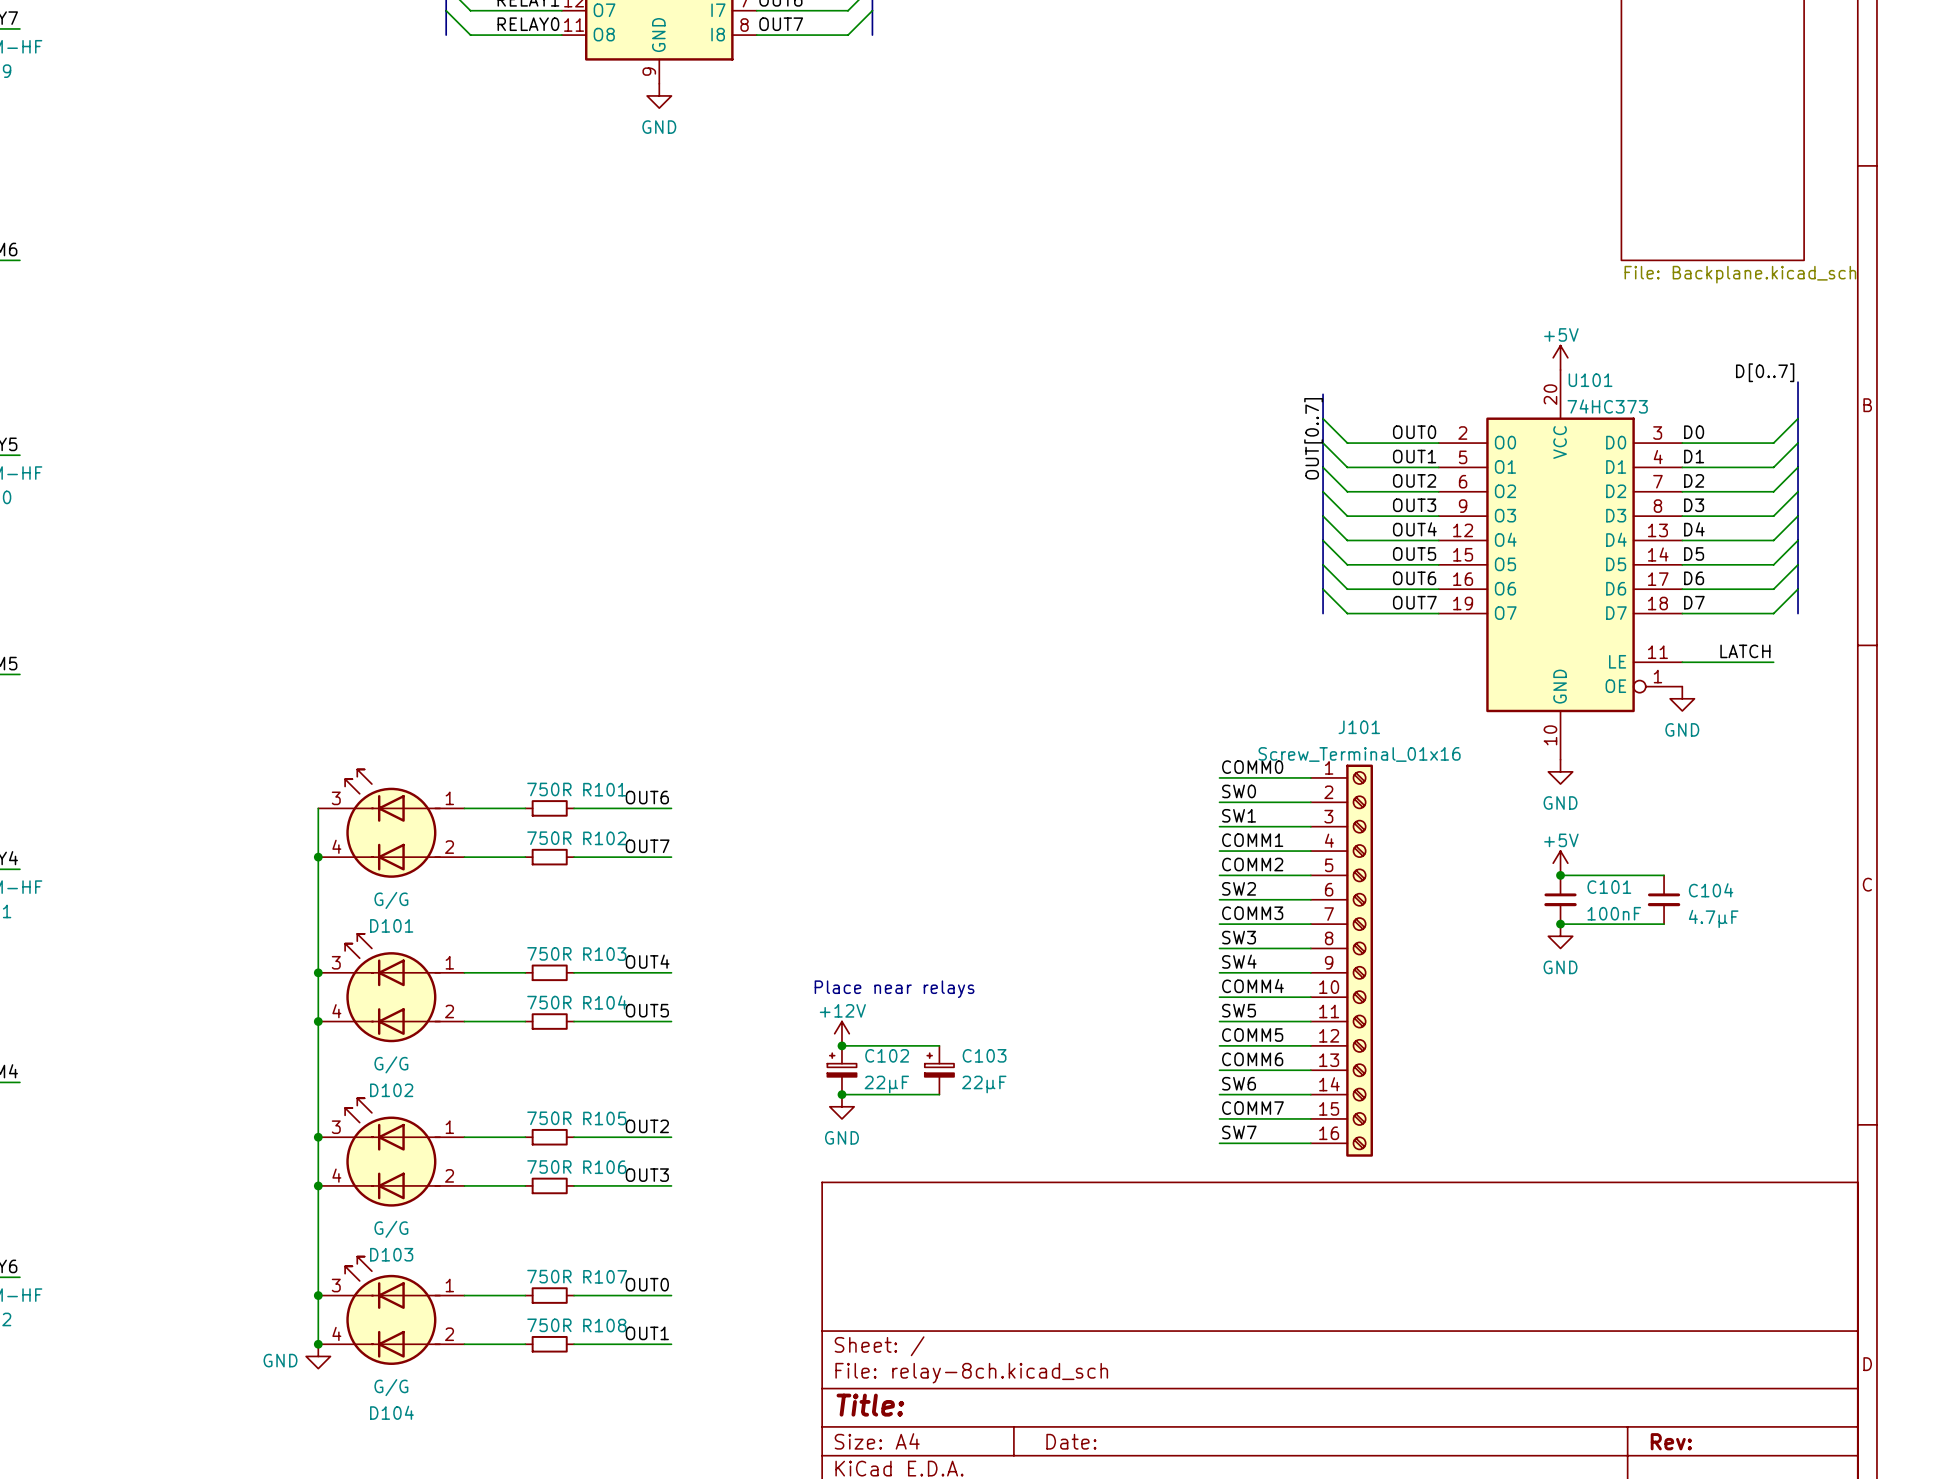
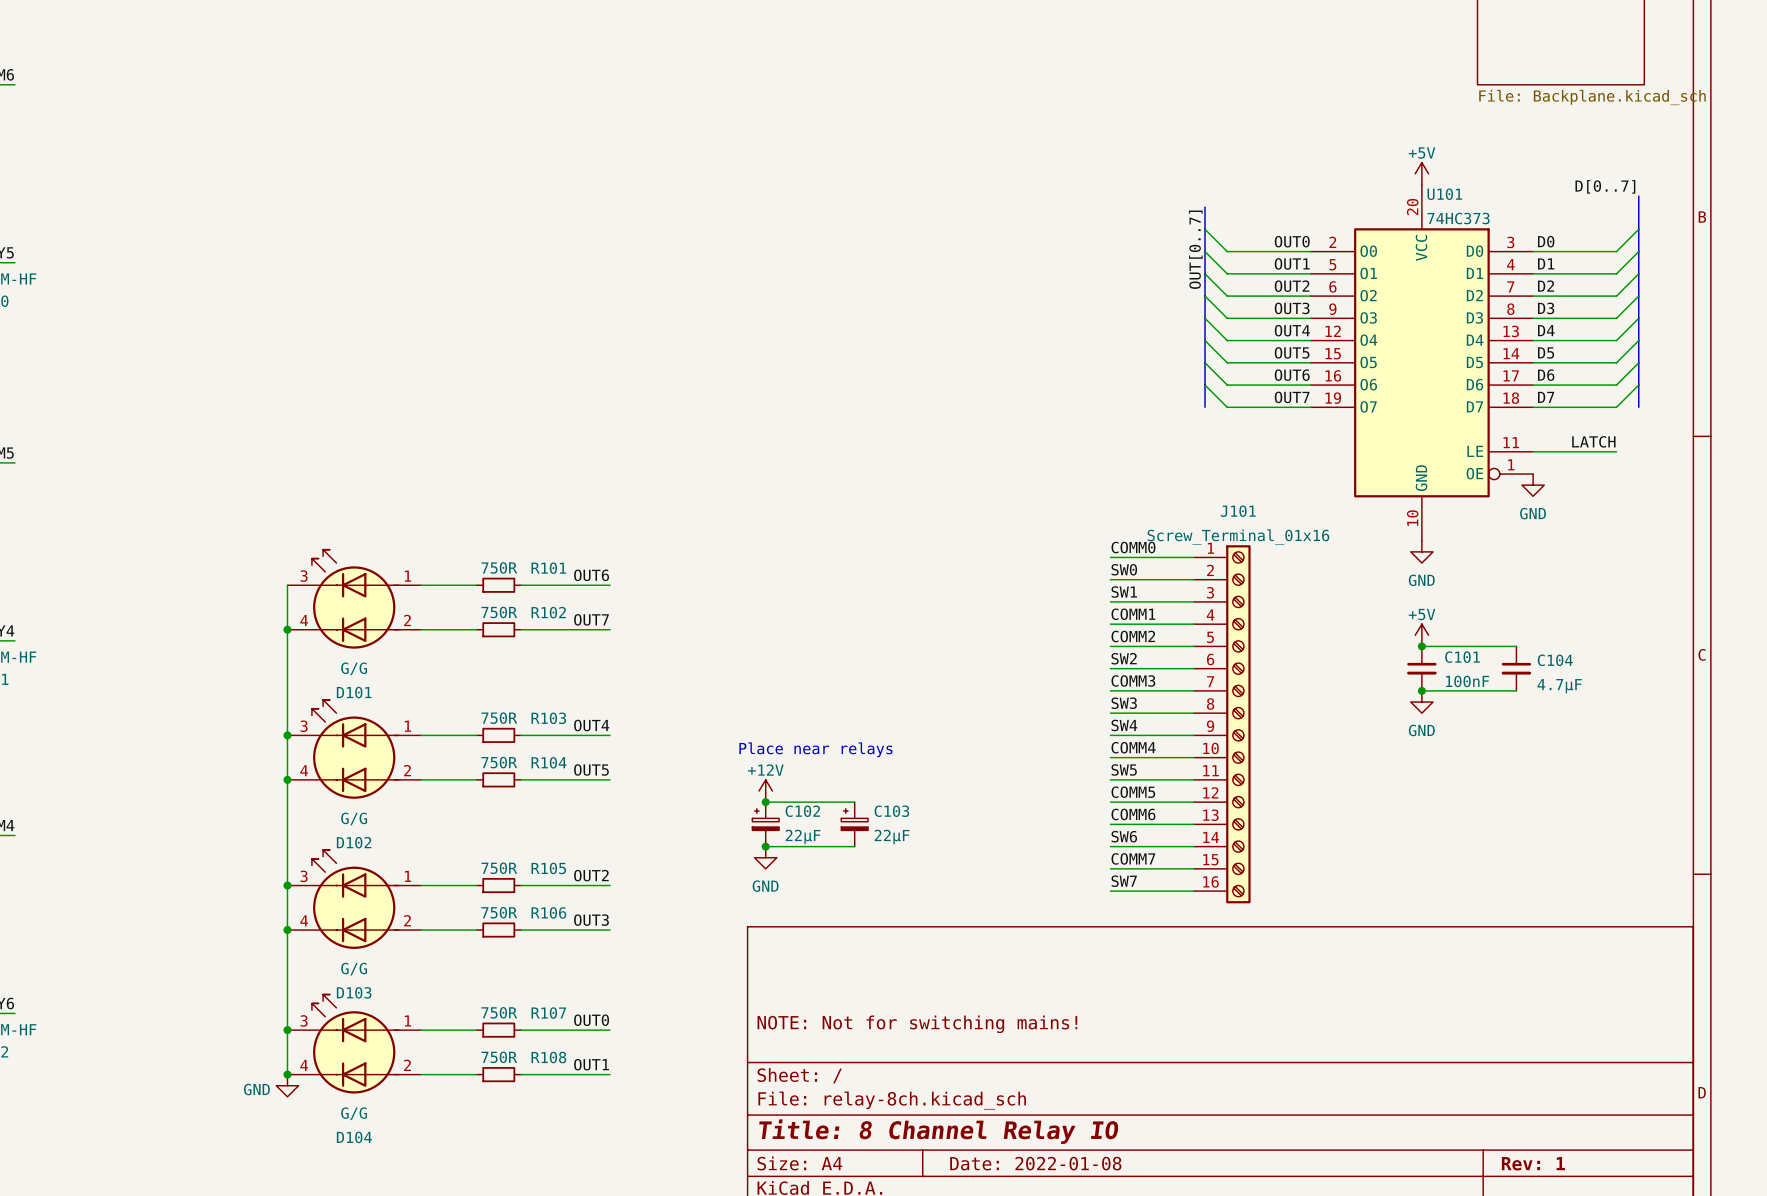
title block: none -> NOTE: Not for switching mains! (917, 1024)
title block: Title: (870, 1405) -> Title: 8 Channel Relay IO (938, 1131)
title block: Date: (1071, 1441) -> Date: 2022-01-08 (1035, 1163)
title block: Rev: (1671, 1441) -> Rev: 1 (1533, 1163)

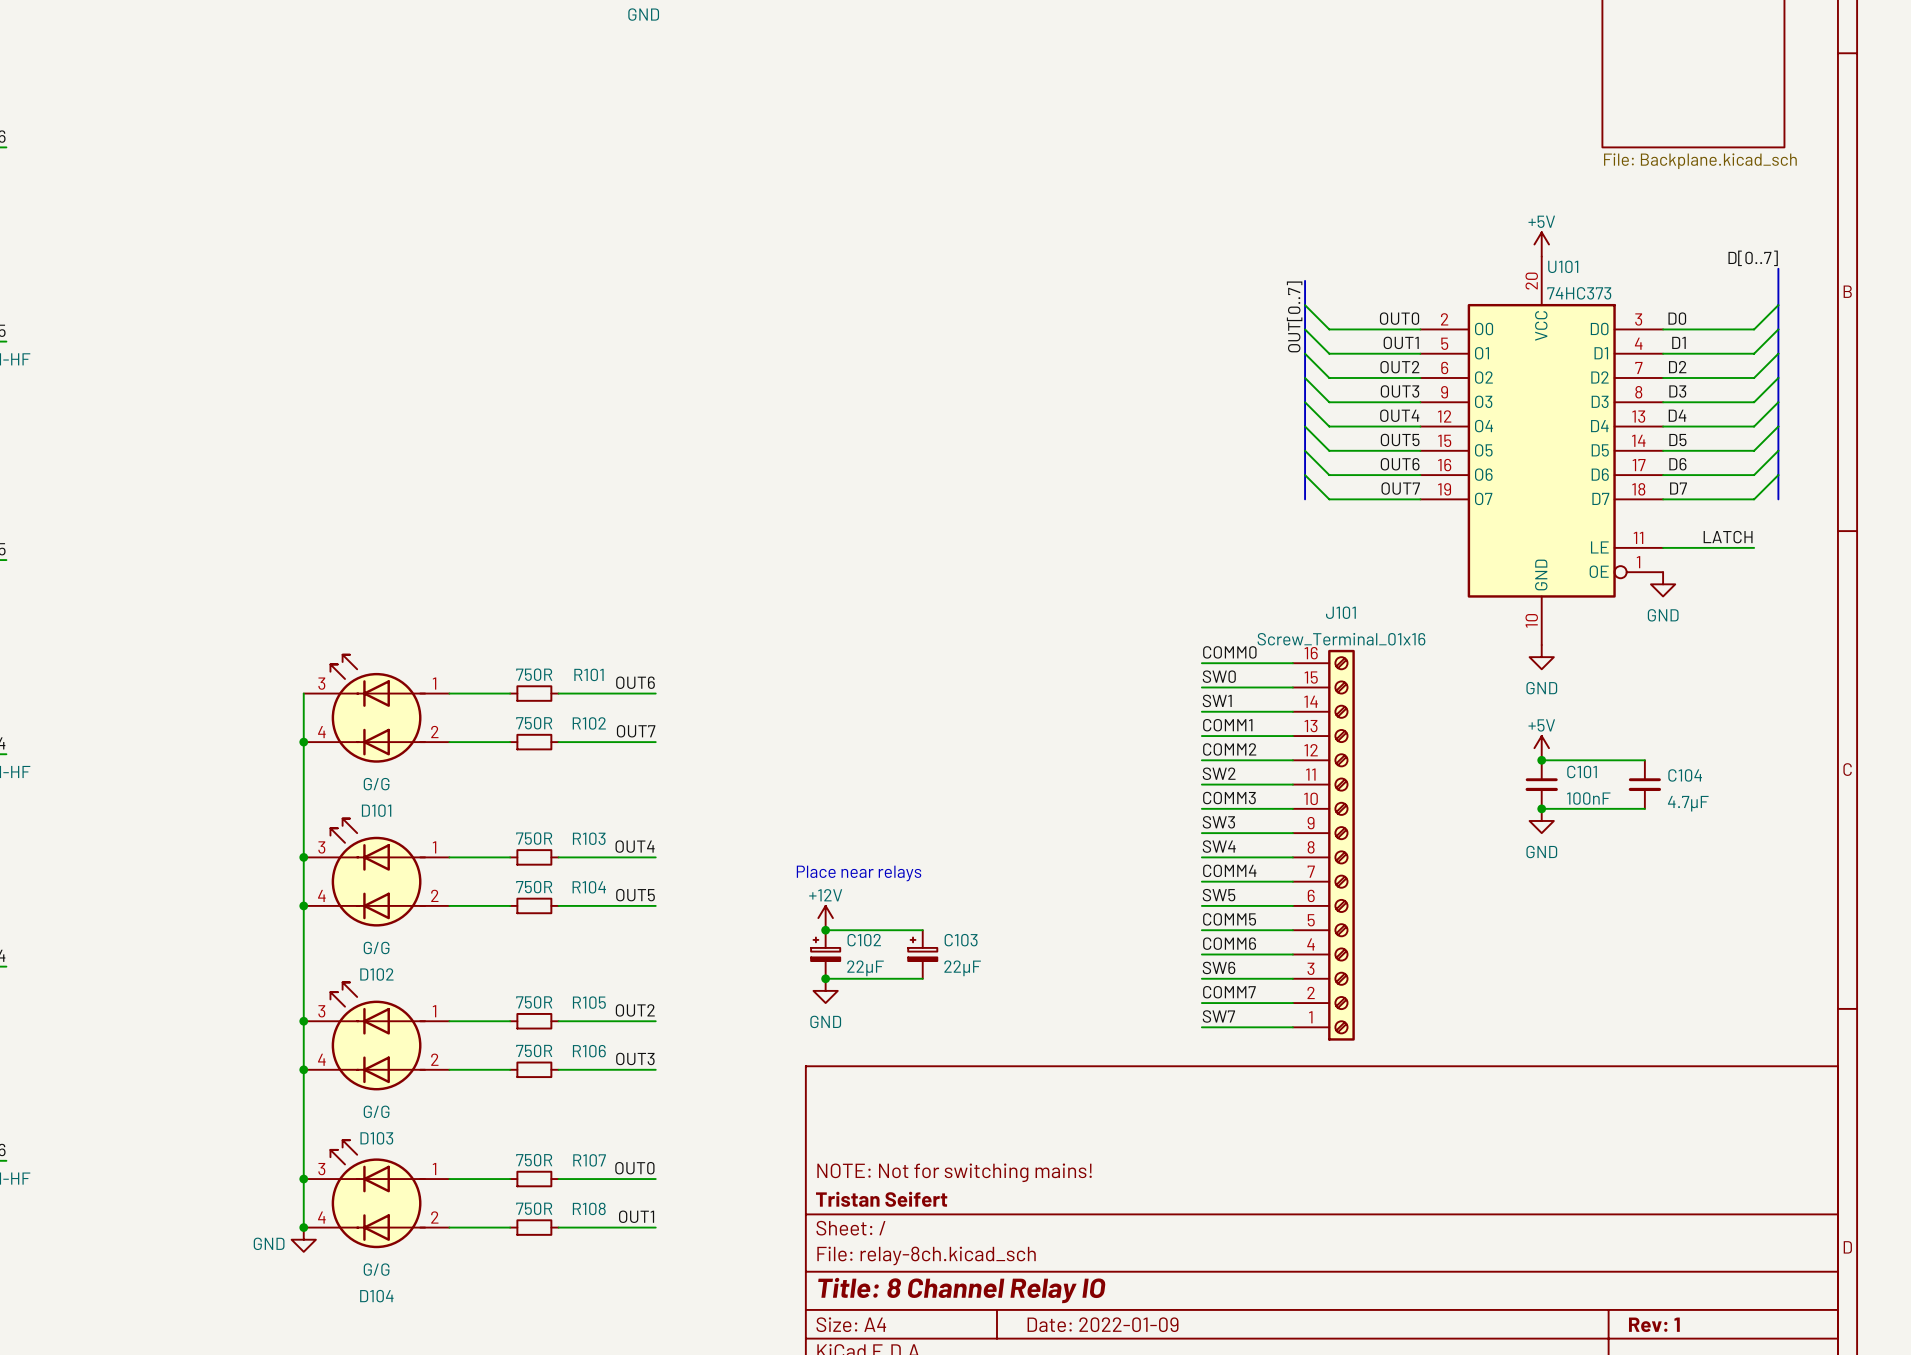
J101 flip: as is (1238, 724) -> up-down (1341, 845)
title block: none -> Tristan Seifert (881, 1199)
title block: Date: 2022-01-08 (1035, 1163) -> Date: 2022-01-09 (1103, 1324)

